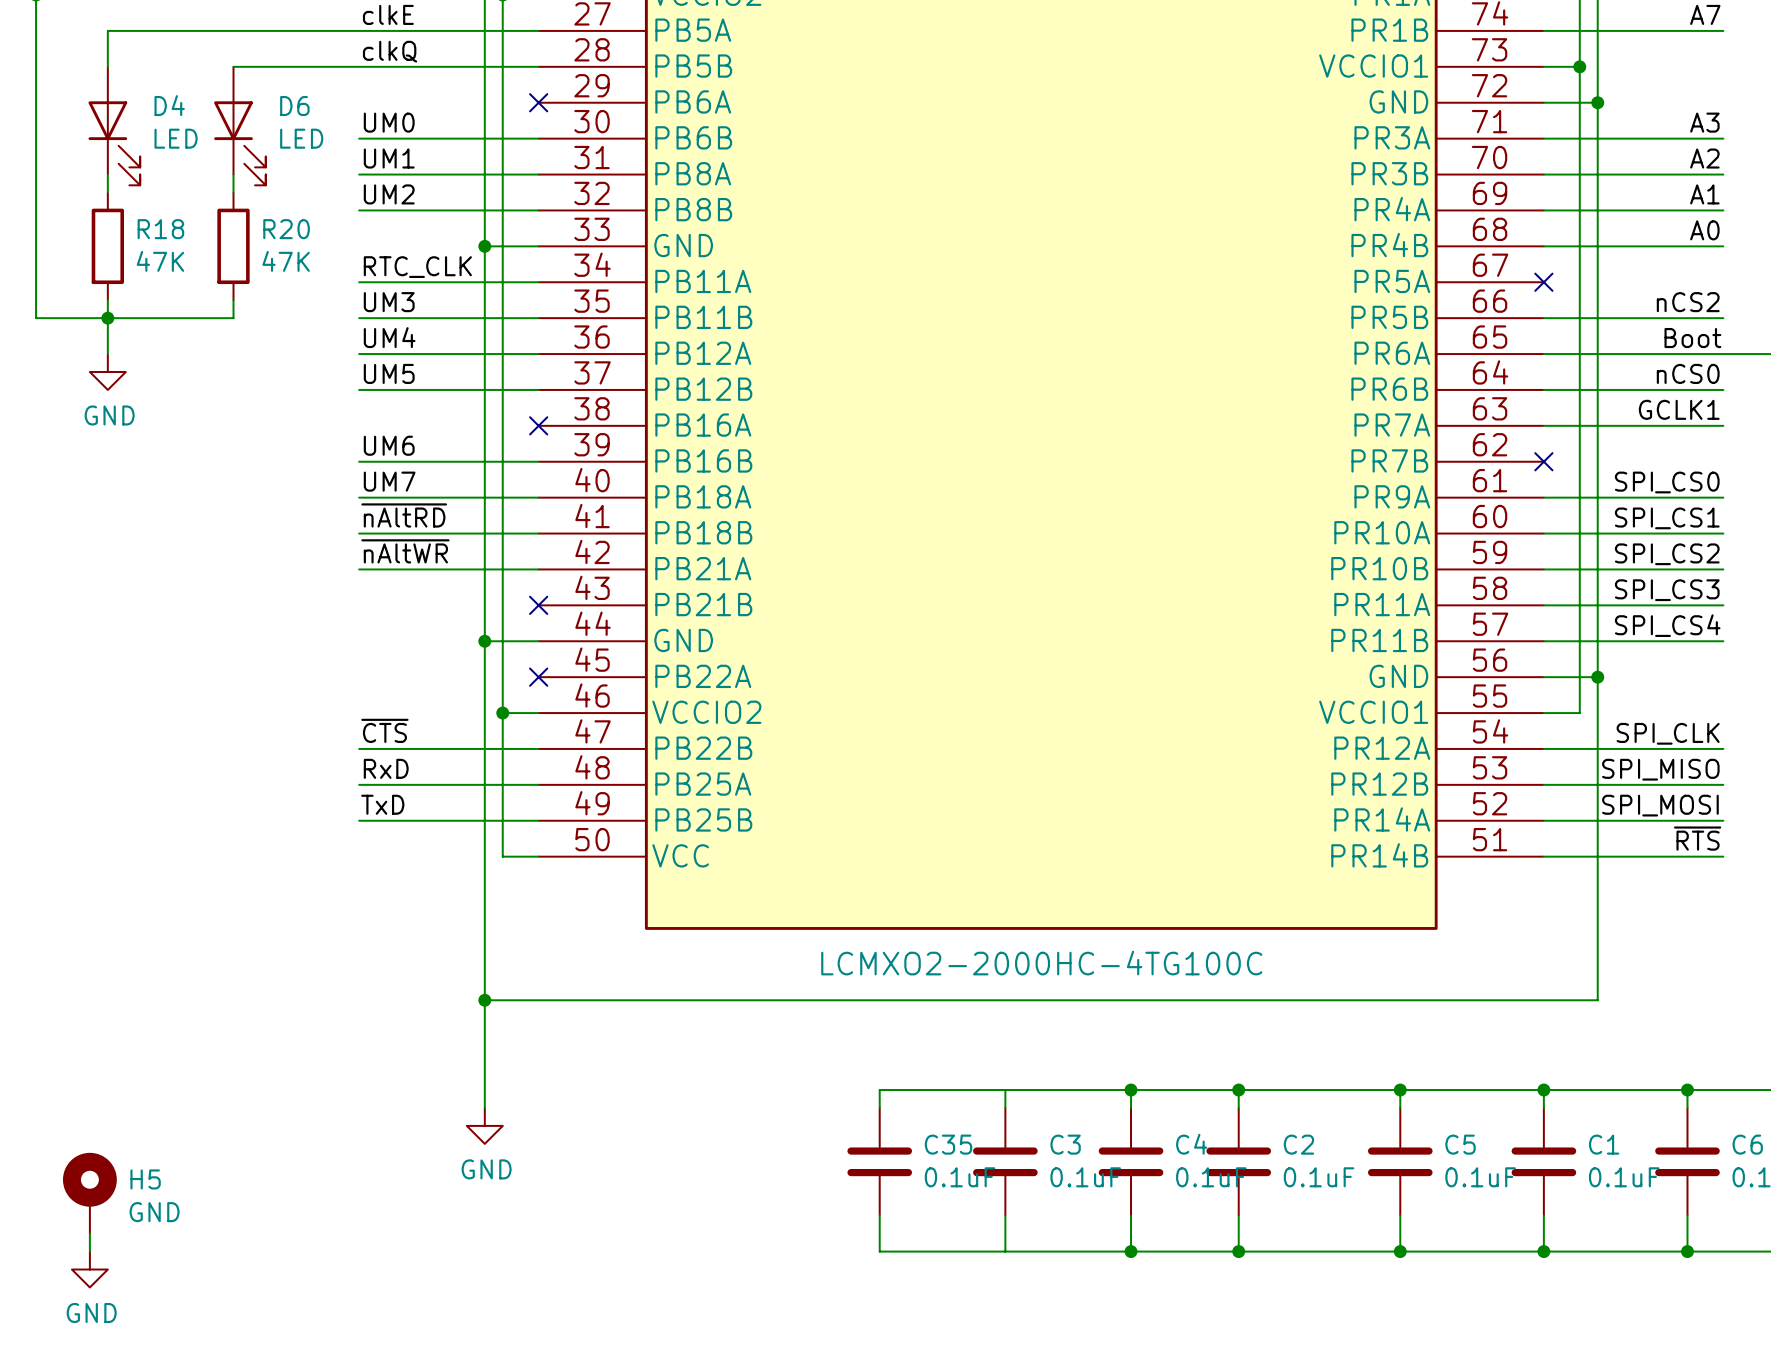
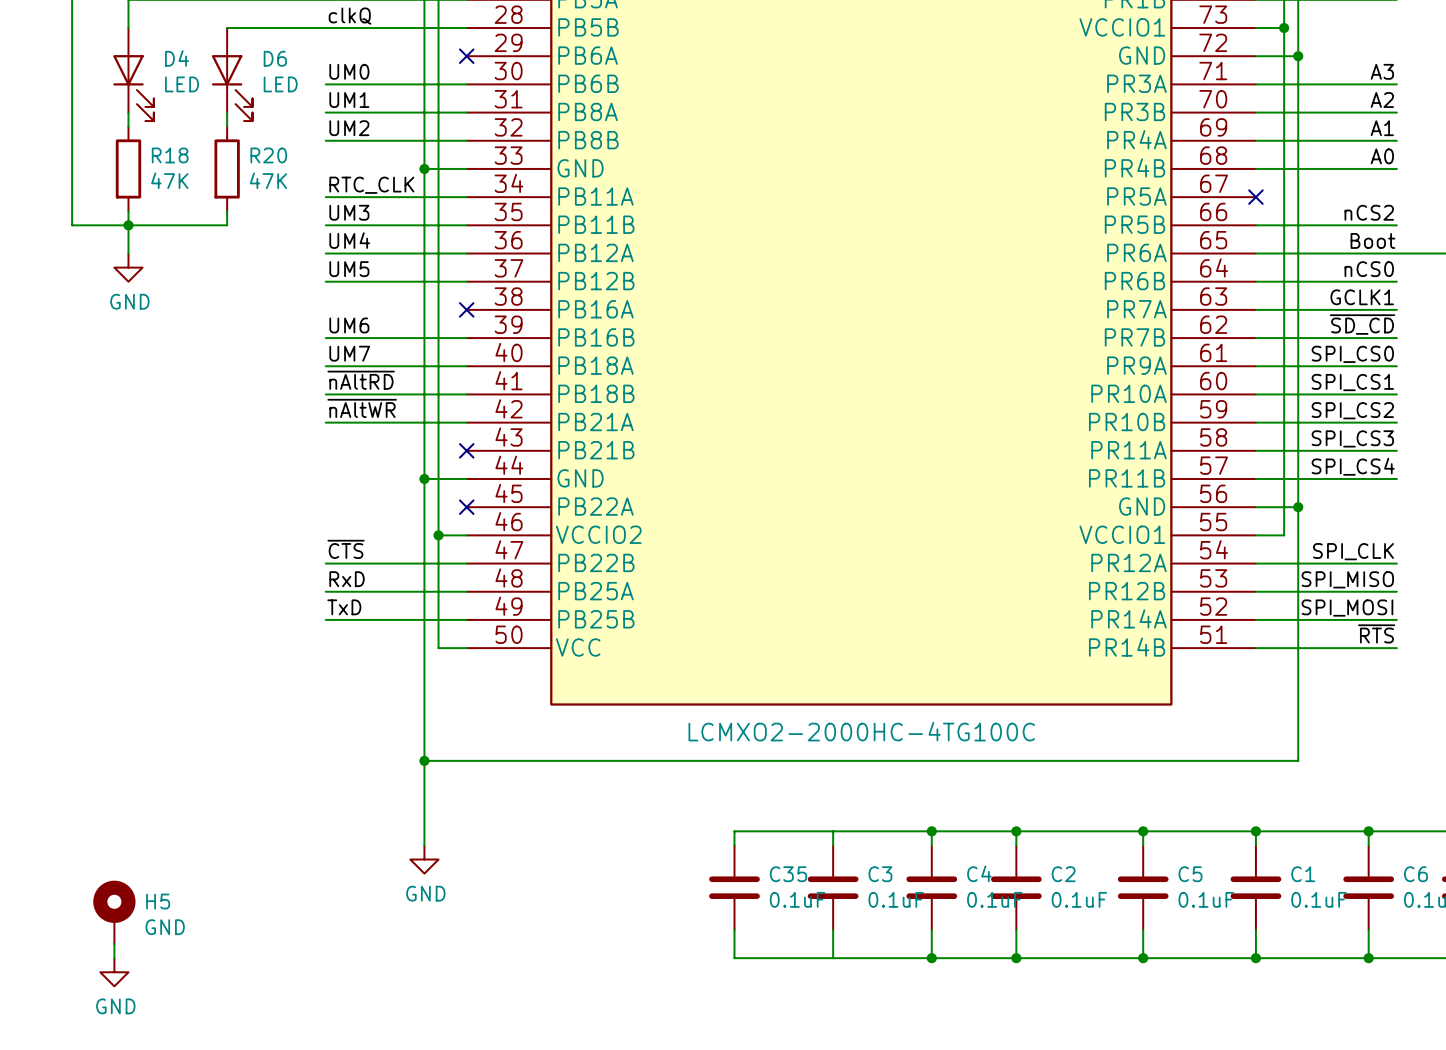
label: none -> ~{SD_CD} (1362, 324)
wire: none -> (1255, 338) (1396, 338)
no-connect mark: (1543, 461) -> none

